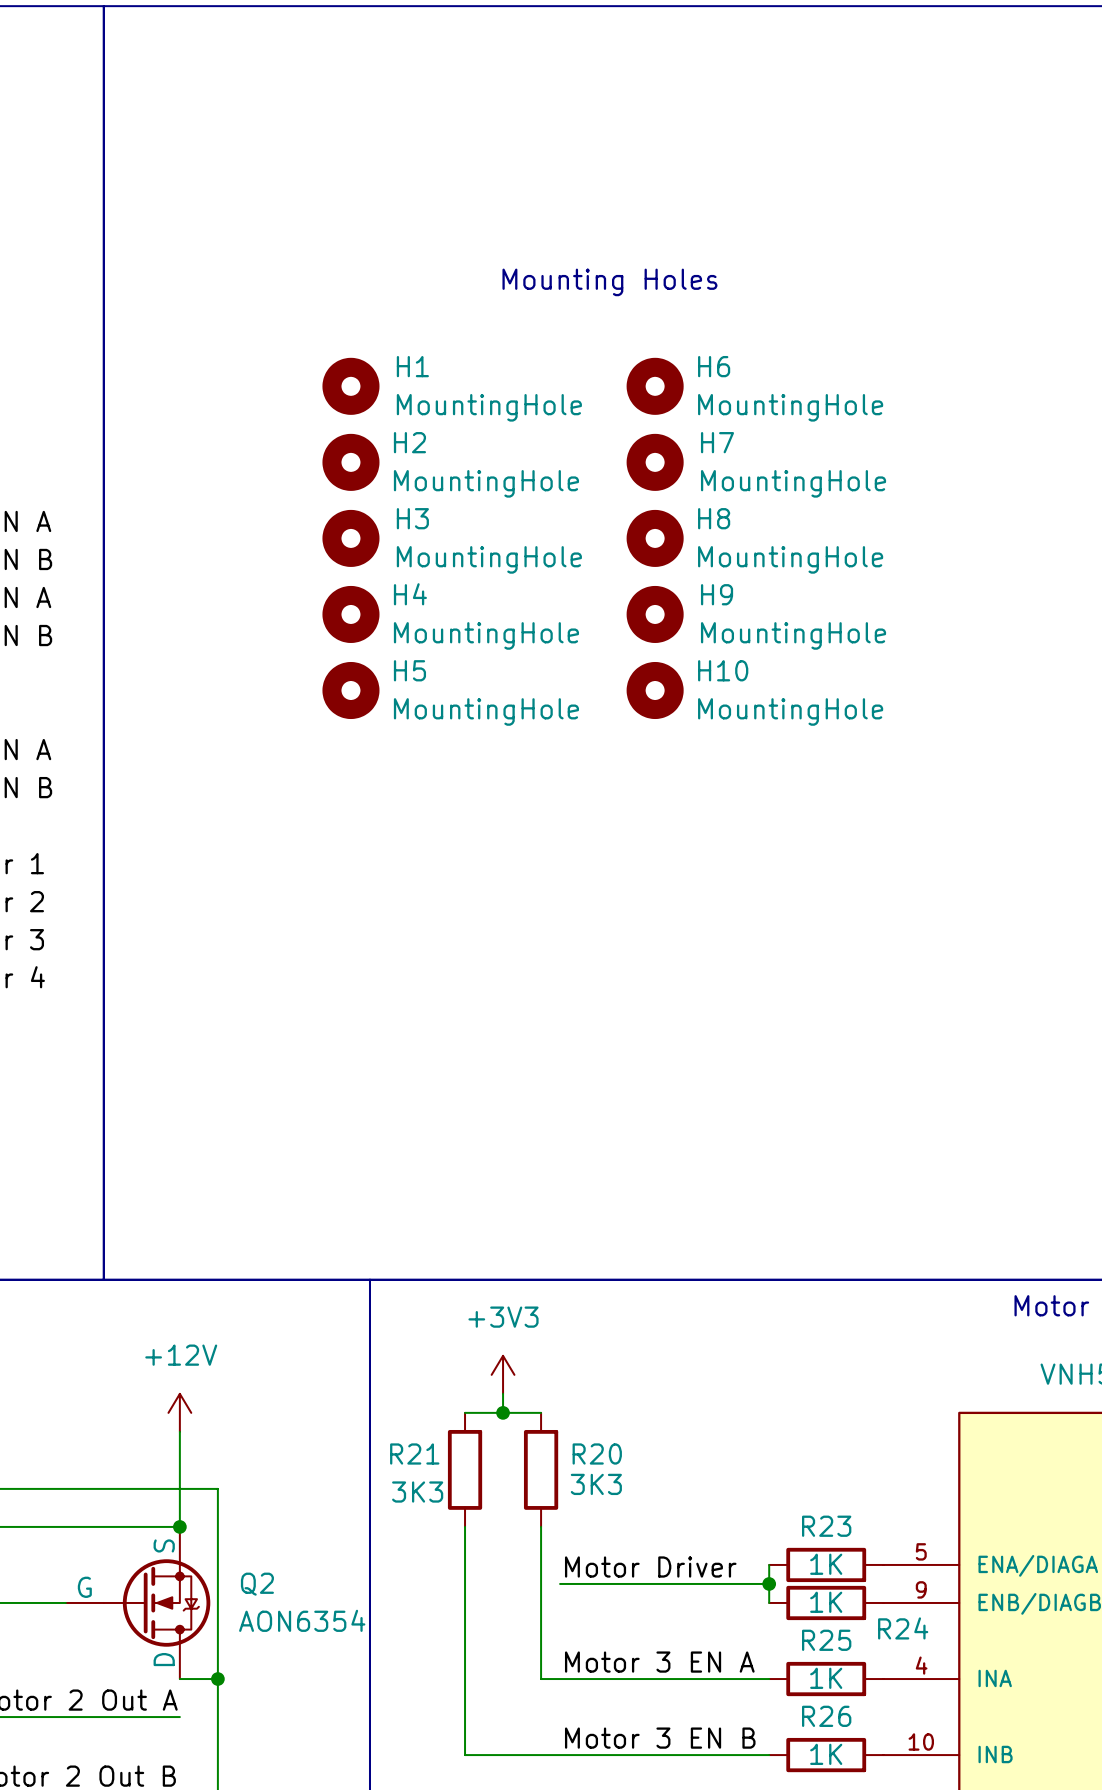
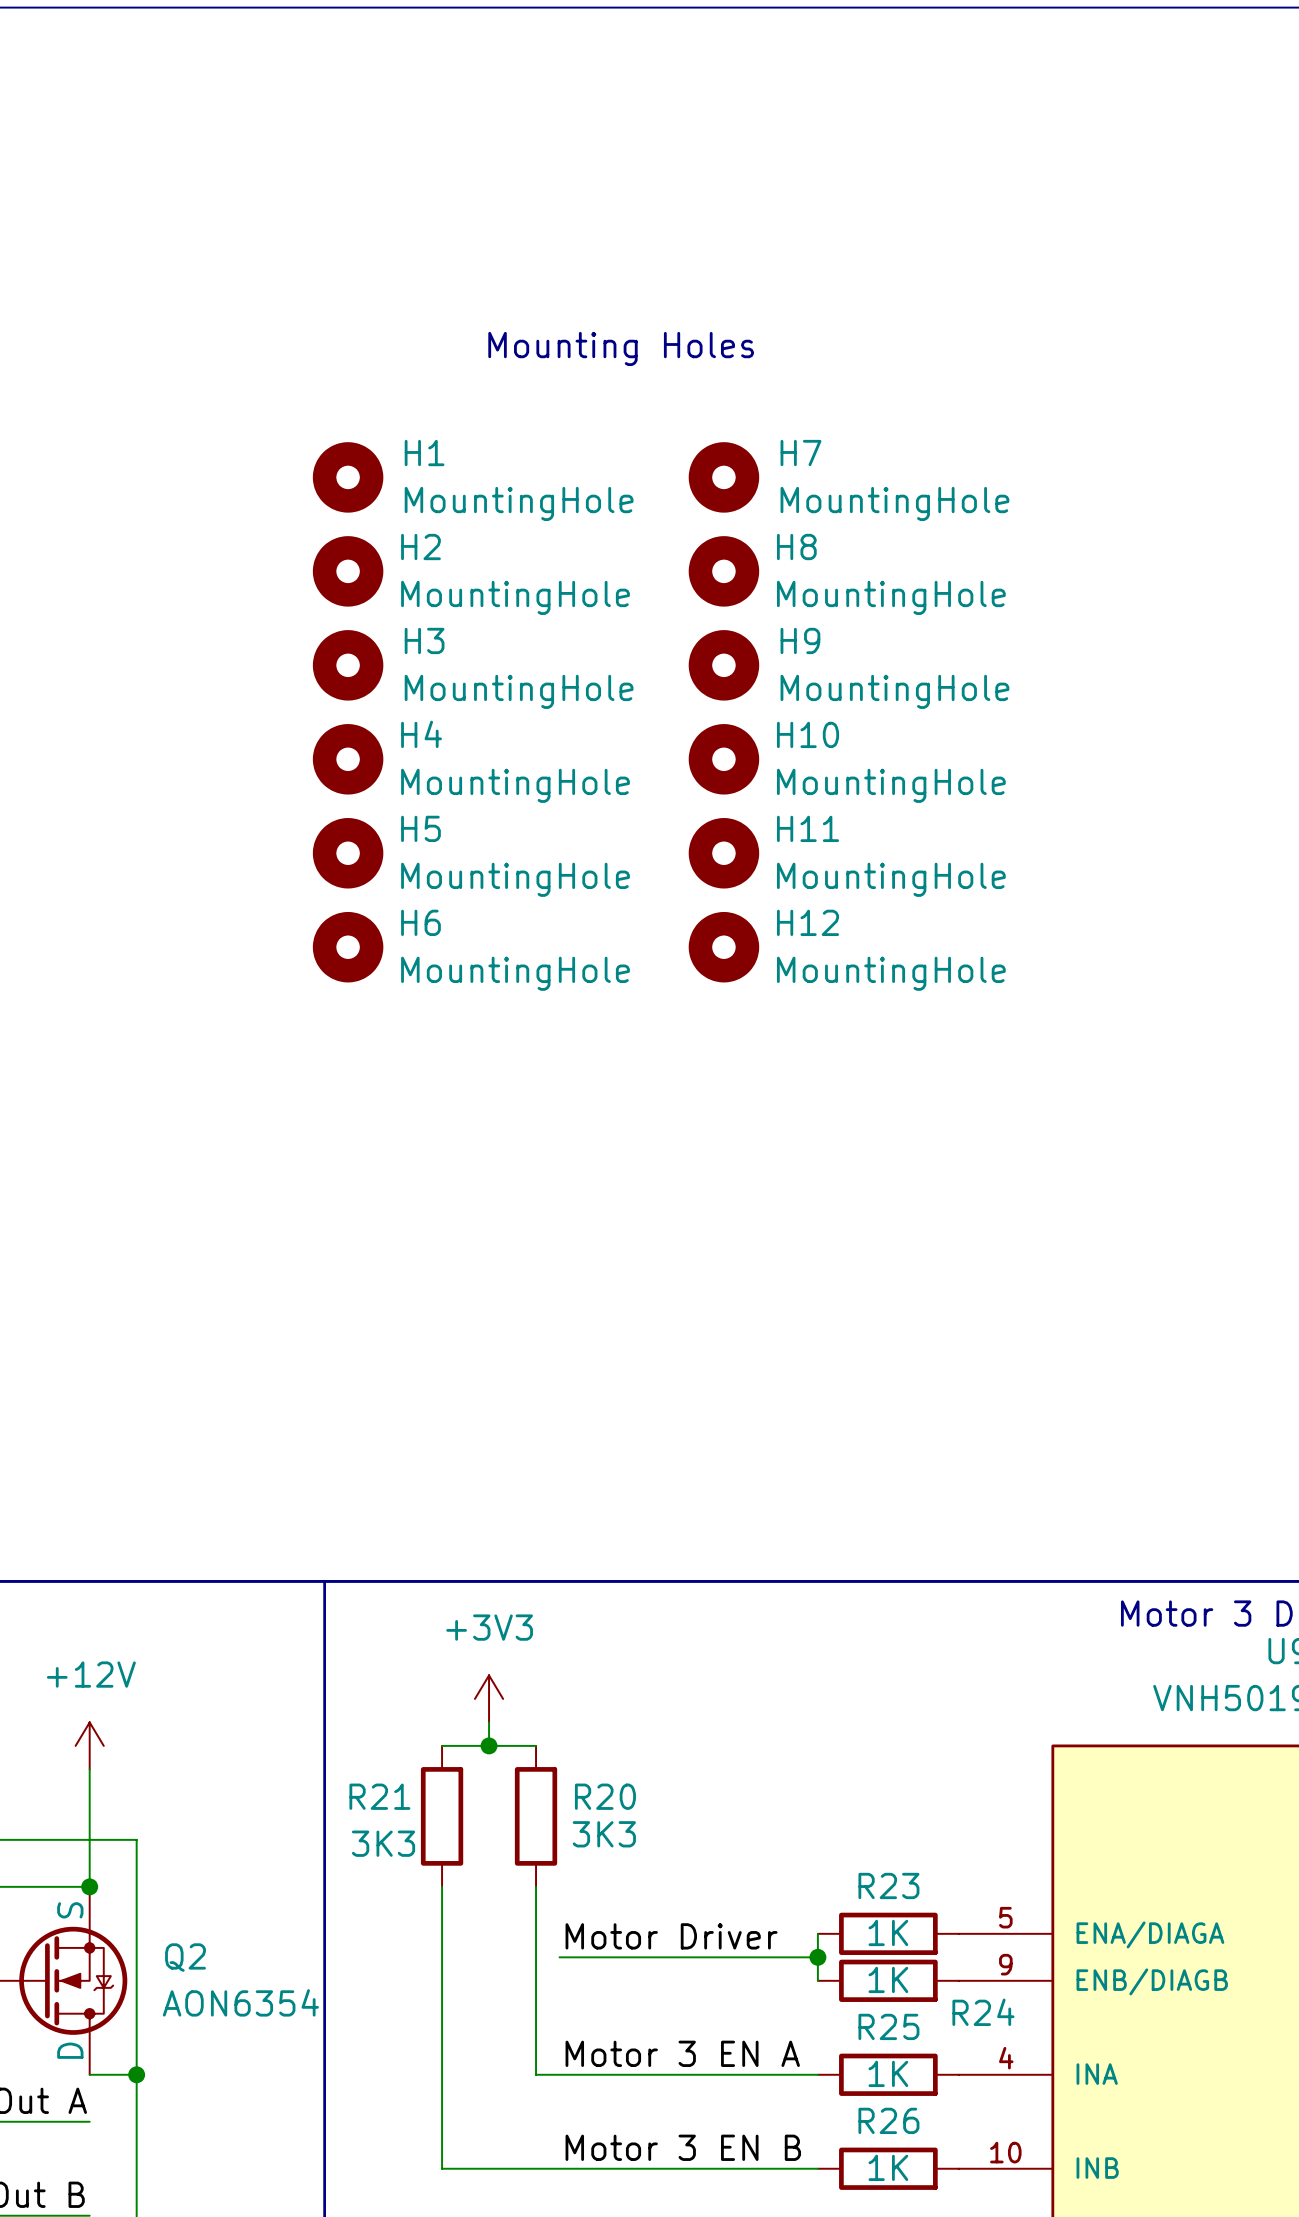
H1 position: (350, 386) -> (348, 477)
H6 position: (655, 386) -> (348, 947)
H2 position: (350, 462) -> (348, 571)
H7 position: (655, 462) -> (723, 477)
H3 position: (350, 538) -> (348, 665)
H8 position: (655, 538) -> (723, 571)
H4 position: (350, 614) -> (348, 759)
H9 position: (655, 614) -> (723, 665)
H5 position: (350, 690) -> (348, 853)
H10 position: (655, 690) -> (723, 759)
H11: none -> MountingHole (723, 853)
H12: none -> MountingHole (723, 947)

